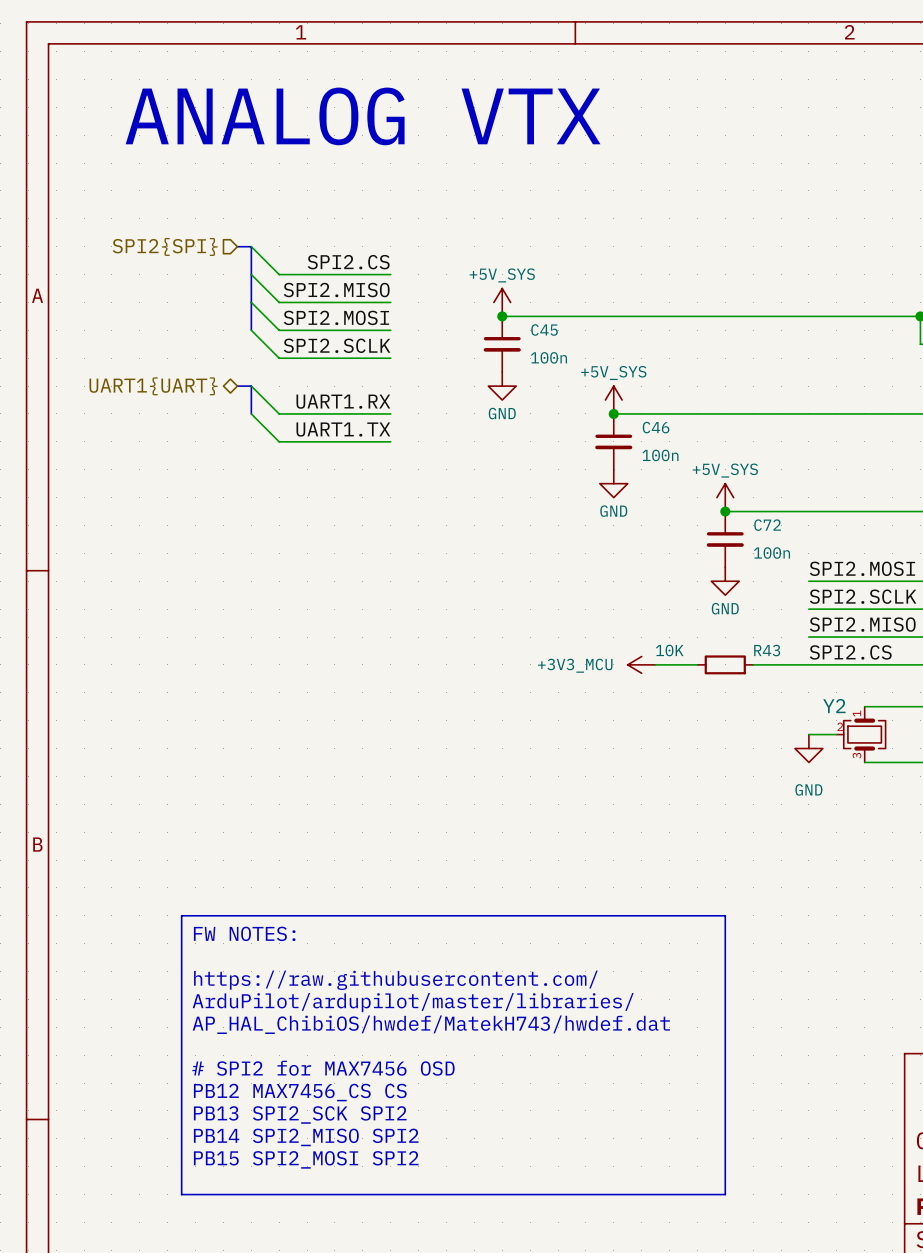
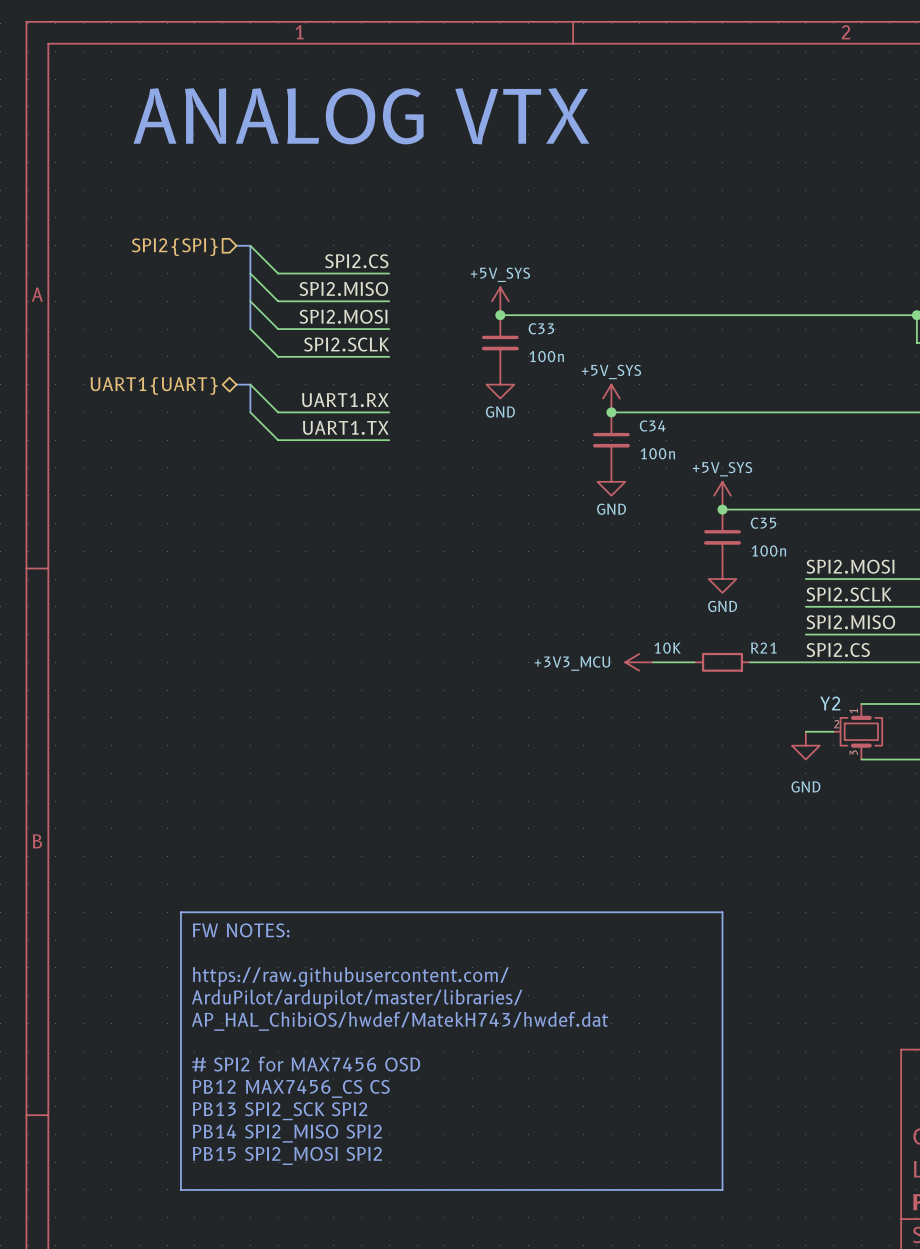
C45 name: C45 (544, 329) -> C33 (541, 328)
C46 name: C46 (656, 427) -> C34 (652, 425)
C72 name: C72 (767, 525) -> C35 (763, 523)
R43 name: R43 (767, 650) -> R21 (763, 648)

